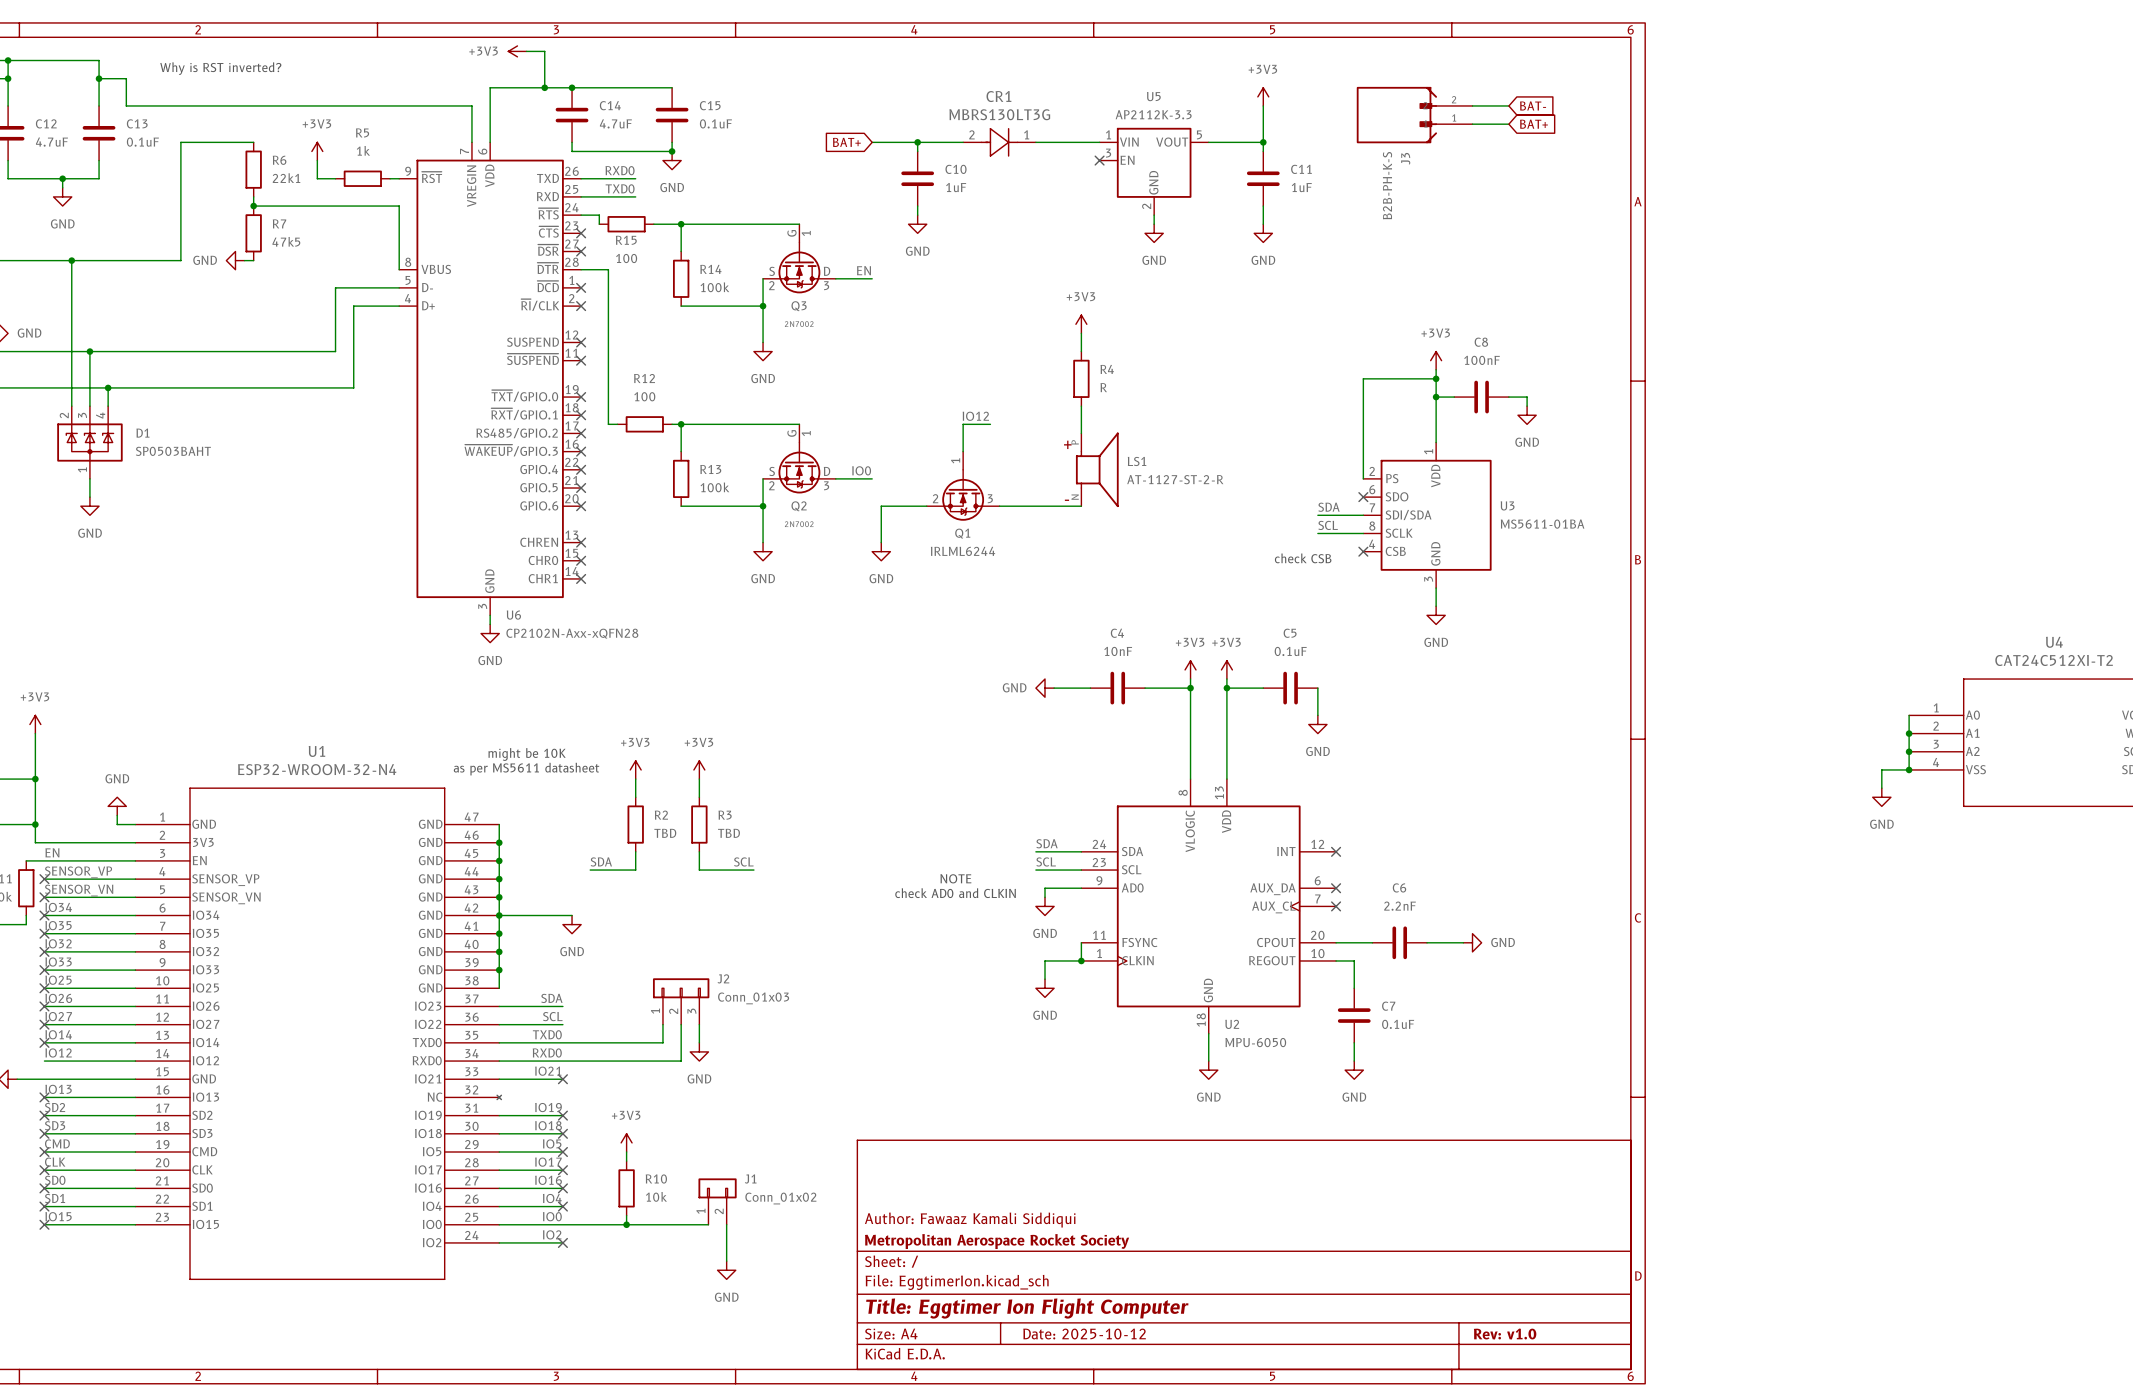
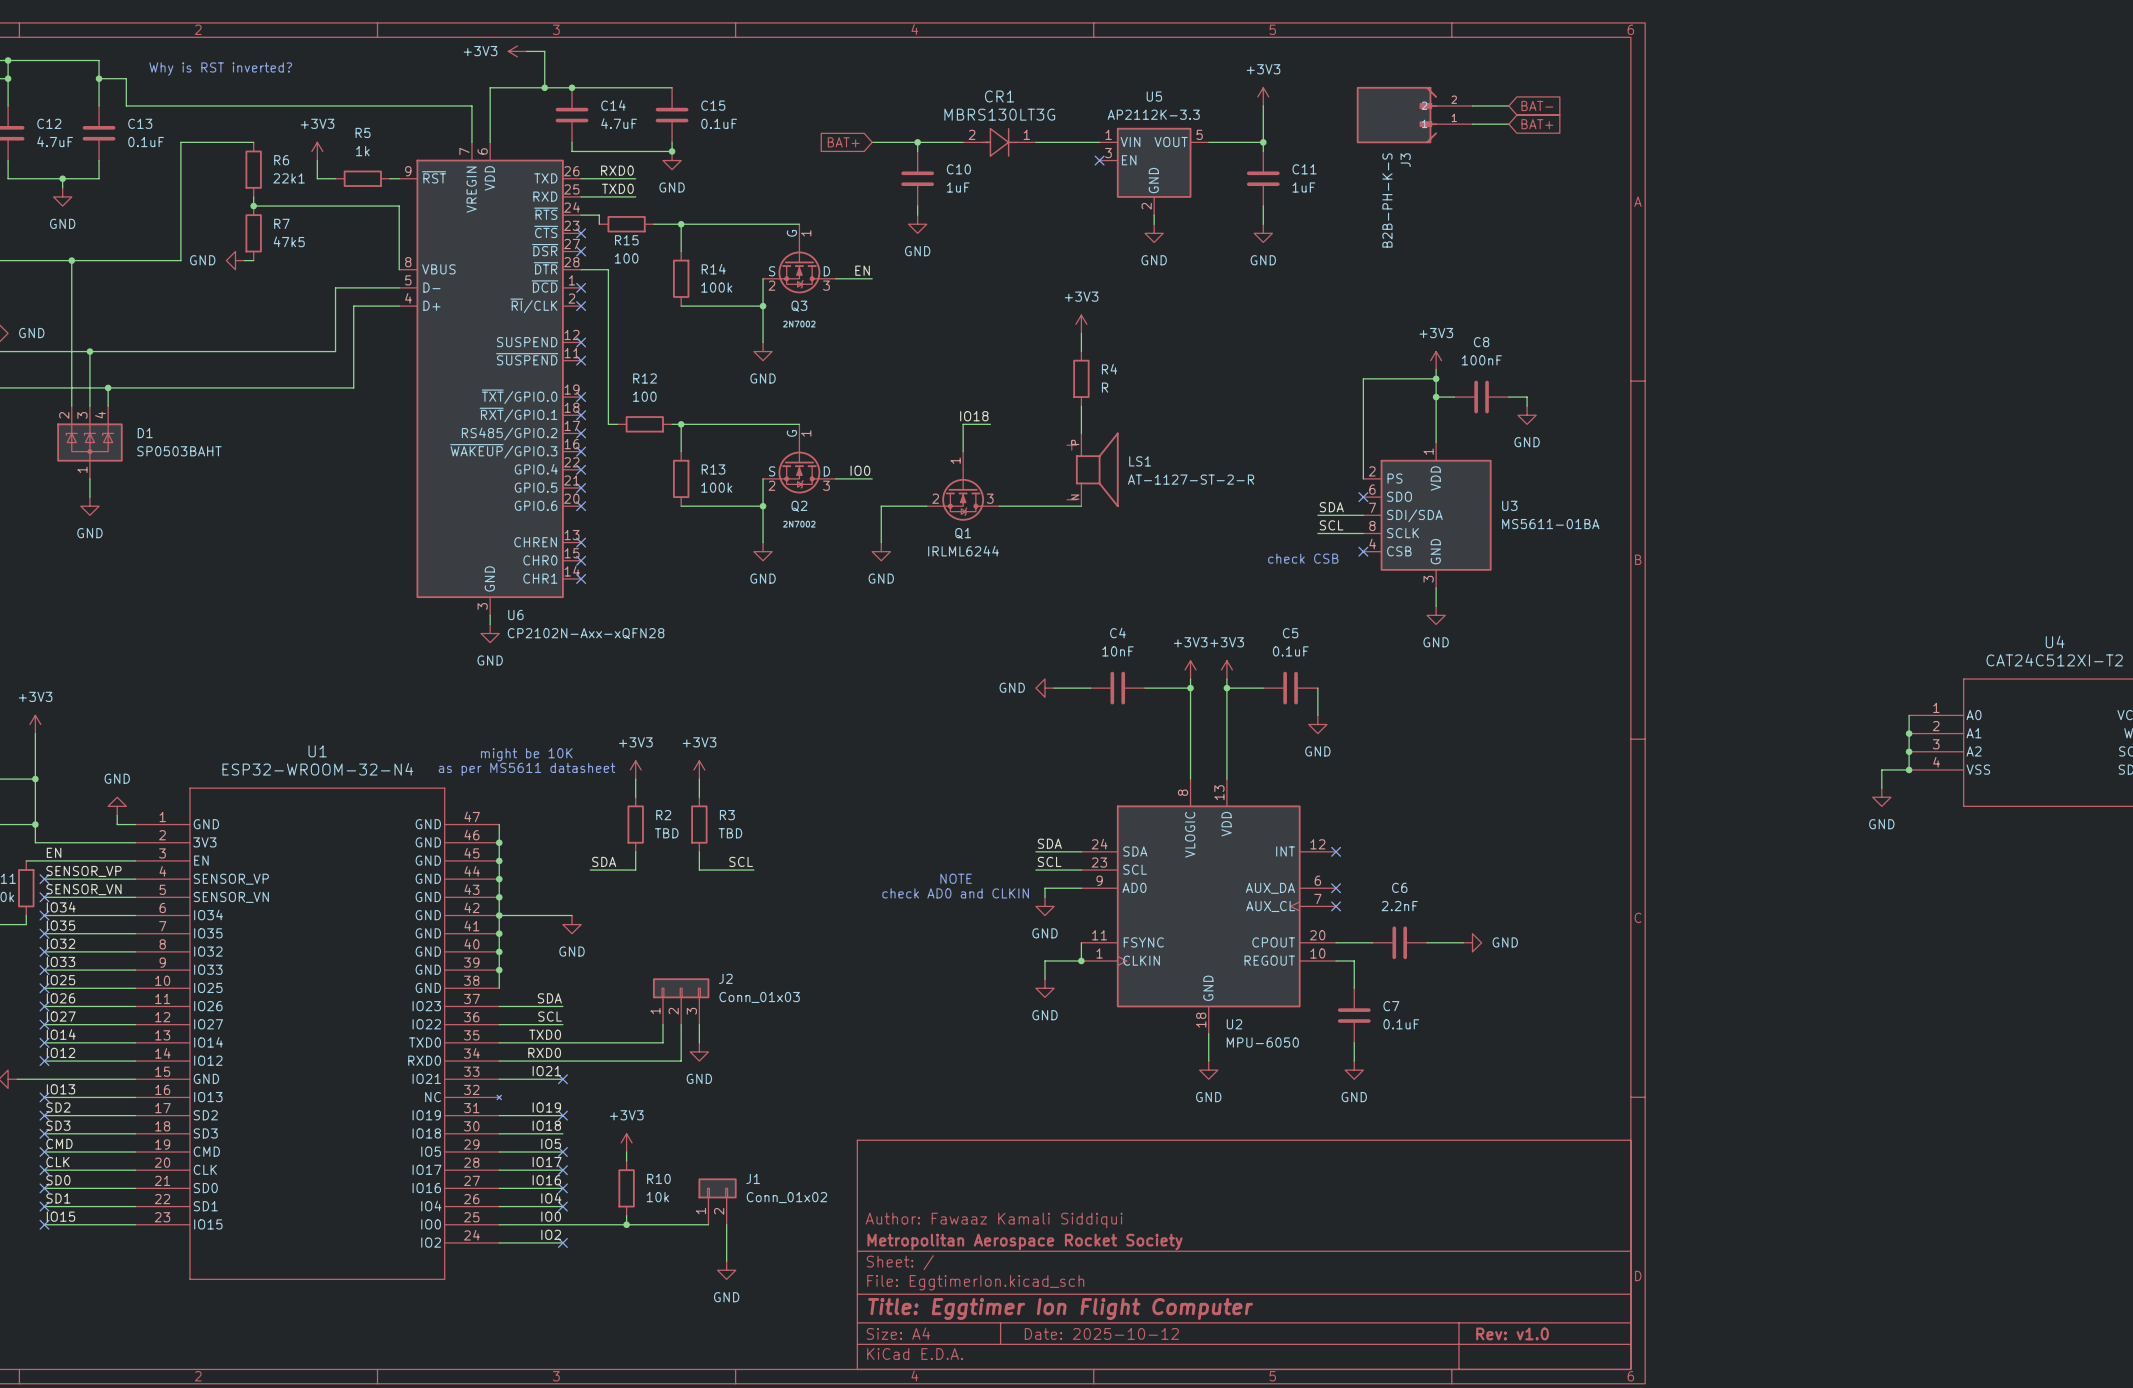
label: IO12 (975, 416) -> IO18 (974, 416)
no-connect mark: none -> (44, 1061)
no-connect mark: (562, 1133) -> none

